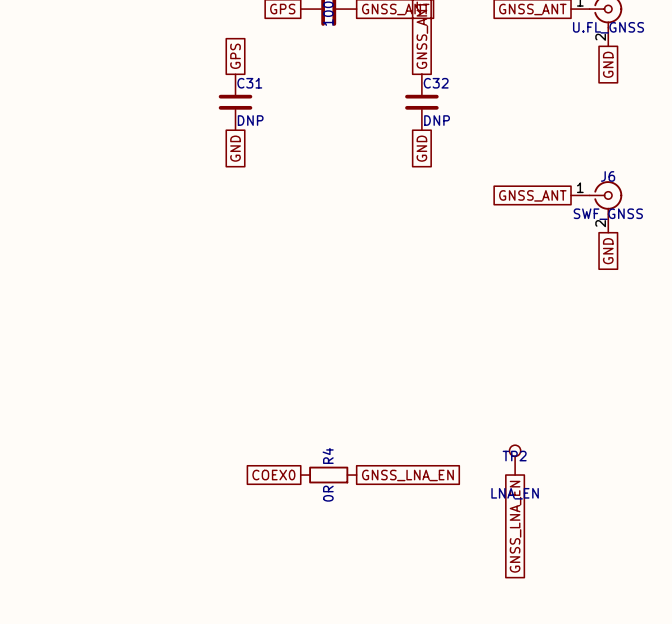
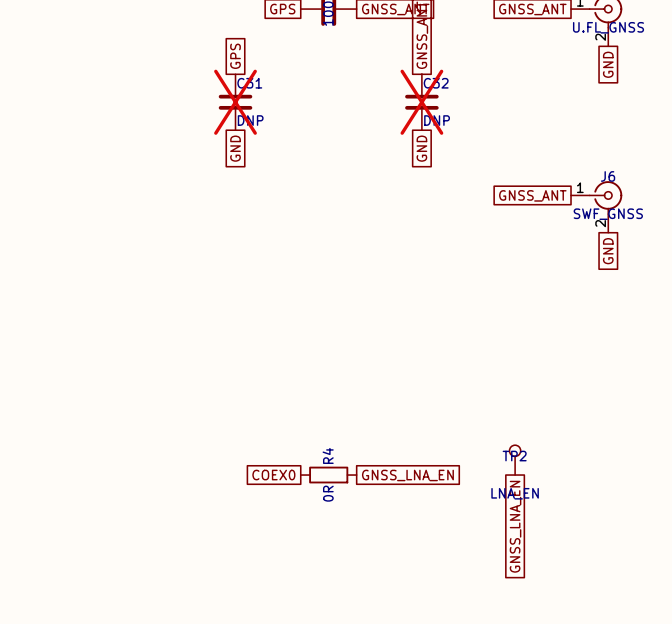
C31 do-not-place cross: none -> (235, 102)
C32 do-not-place cross: none -> (421, 102)

